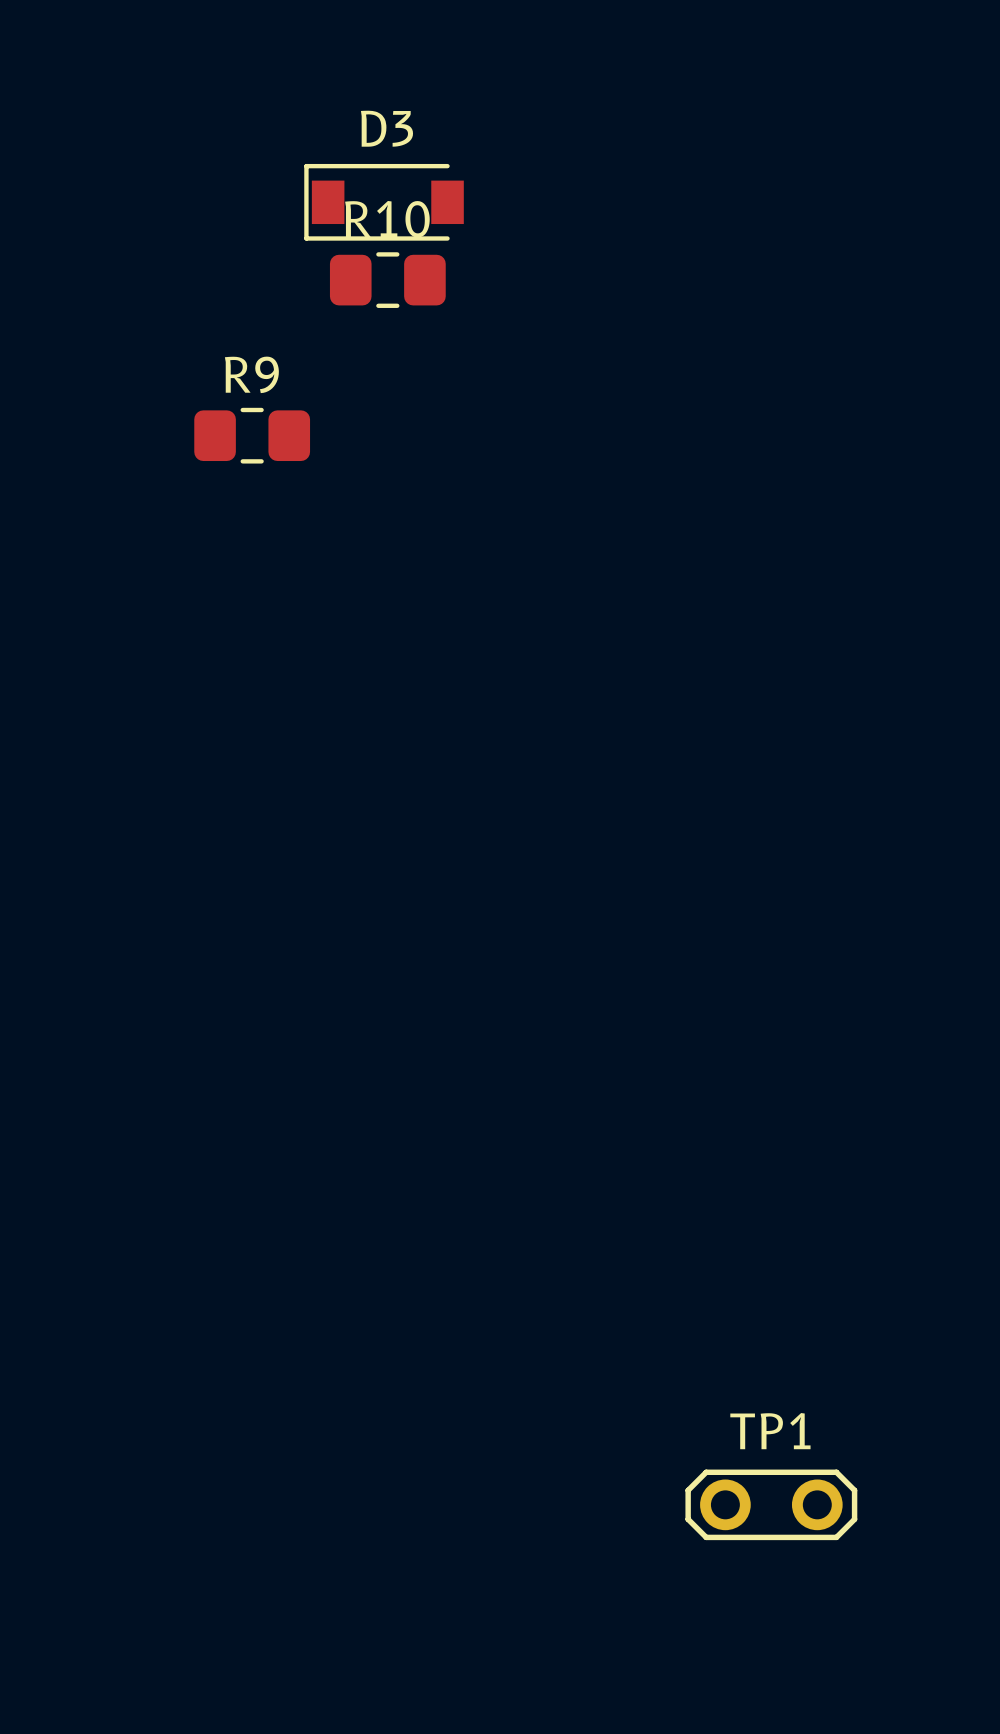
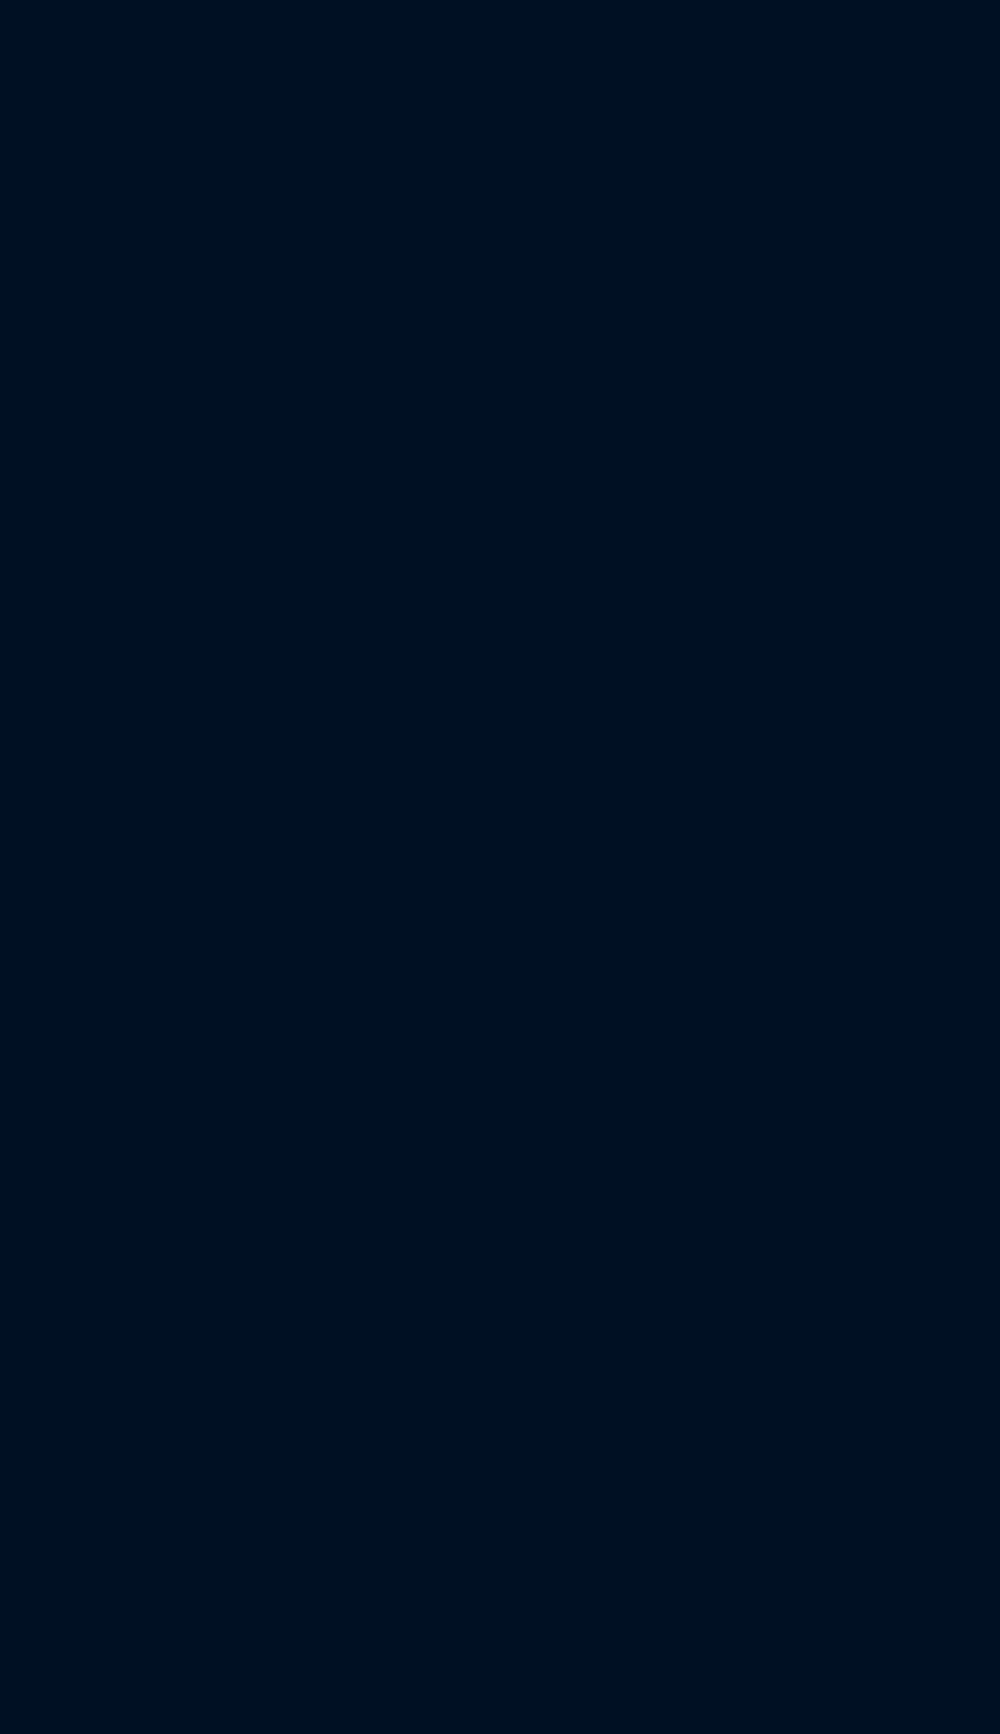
D3: (384, 202) -> none
R10: (387, 280) -> none
R9: (252, 435) -> none
TP1: (771, 1504) -> none

